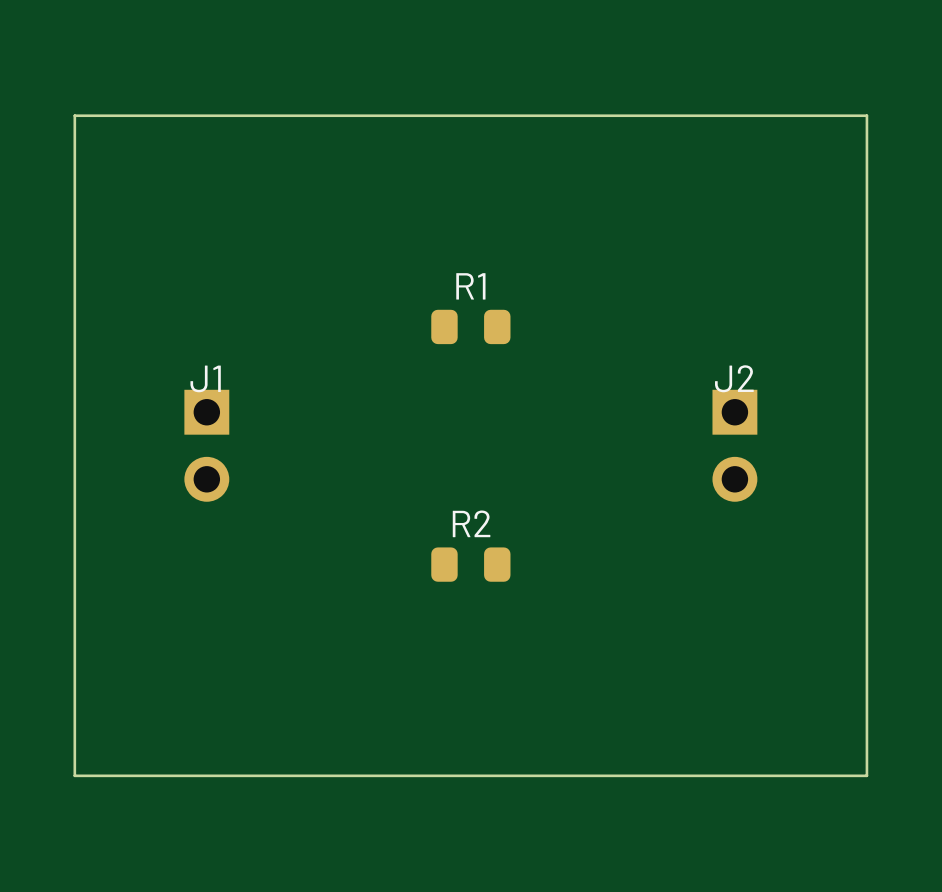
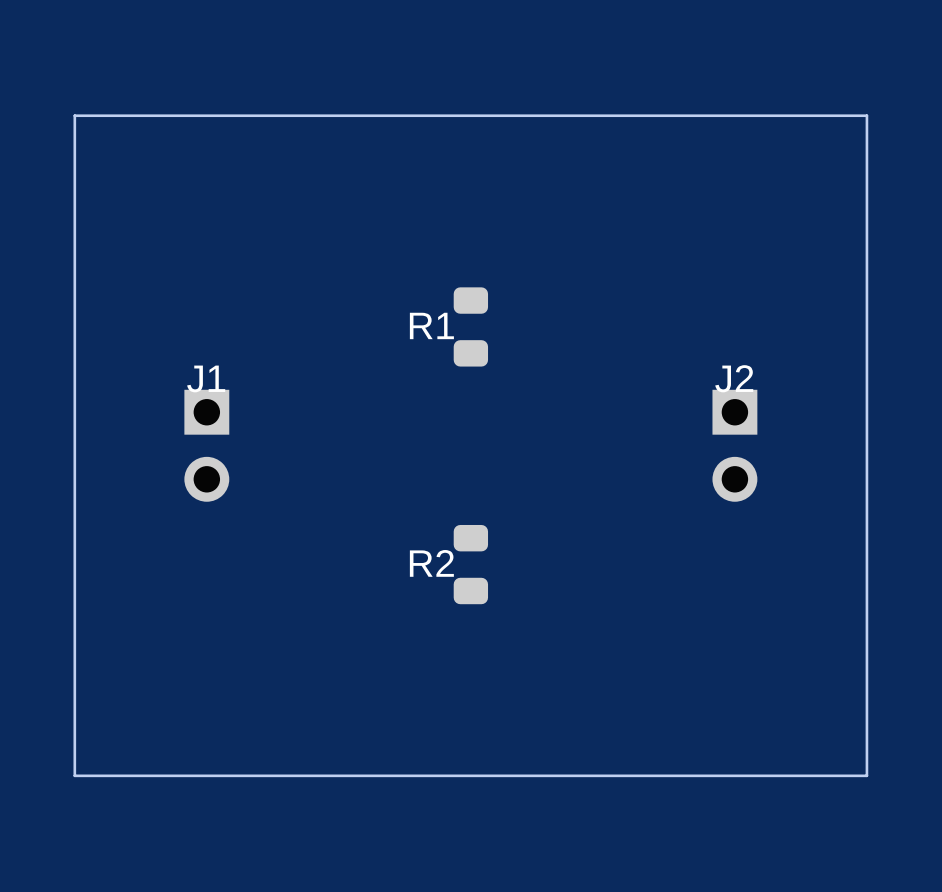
R1 name position: R1 (470, 286) -> R1 (431, 325)
R1 rotation: 0° (470, 326) -> 90° clockwise (470, 326)
R2 name position: R2 (471, 523) -> R2 (431, 563)
R2 rotation: 0° (470, 564) -> 90° clockwise (470, 564)

